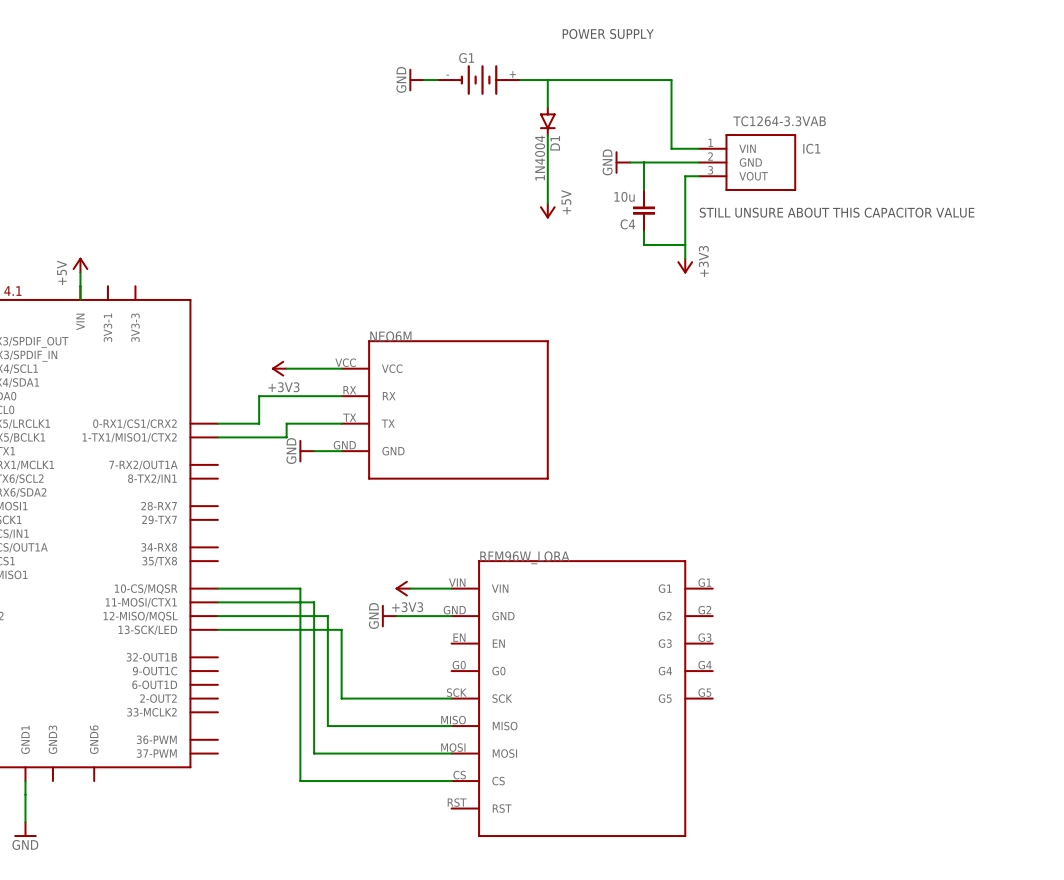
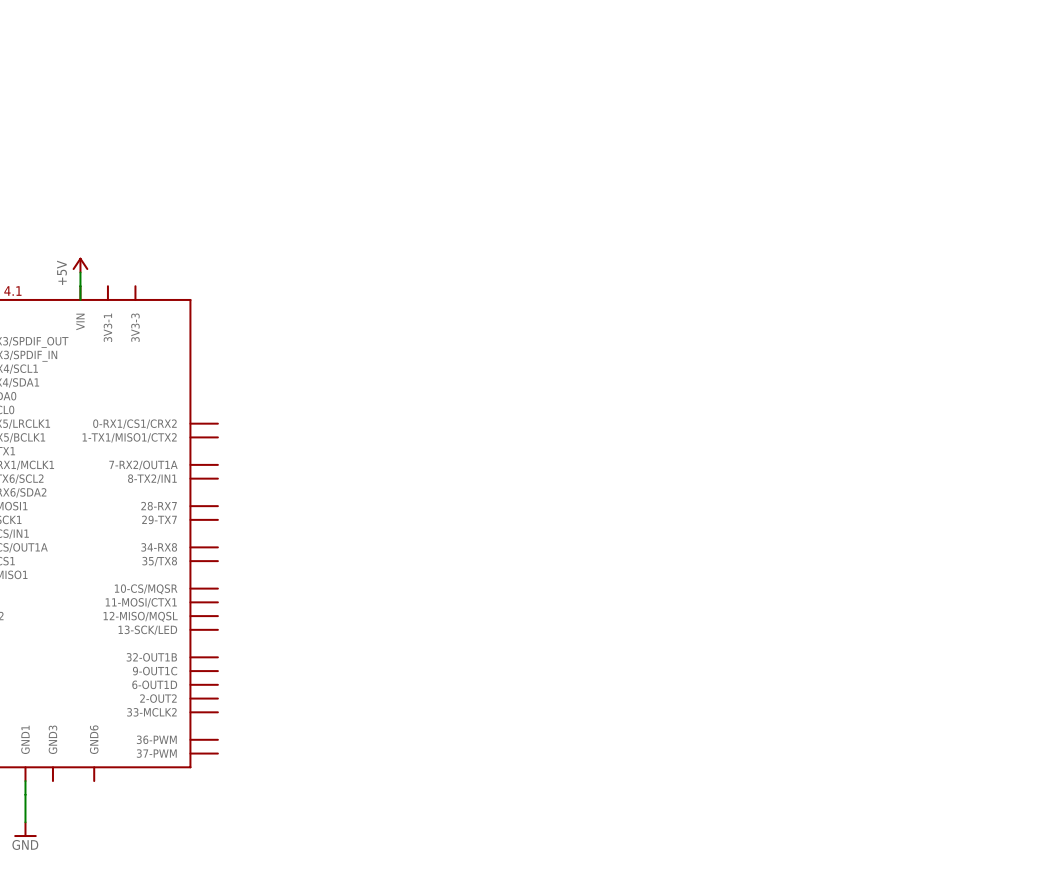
text: POWER SUPPLY (608, 34) -> none
power symbol: GND (416, 80) -> none
wire: (424, 80) (437, 80) -> none
G1: (479, 80) -> none
wire: (520, 80) (671, 80) (671, 148) (699, 148) -> none
wire: (547, 80) (547, 107) -> none
D1: 1N4004 (547, 121) -> none
wire: (547, 135) (547, 203) -> none
power symbol: GND (623, 162) -> none
wire: (630, 162) (699, 162) -> none
wire: (644, 162) (644, 190) -> none
IC1: TC1264-3.3VAB (747, 162) -> none
wire: (699, 176) (685, 176) (685, 258) -> none
power symbol: +5V (547, 210) -> none
C4: 10u (644, 210) -> none
text: STILL UNSURE ABOUT THIS CAPACITOR VALUE (837, 212) -> none
wire: (644, 231) (644, 244) (685, 244) -> none
power symbol: +3V3 (685, 265) -> none
power symbol: +3V3 (279, 368) -> none
wire: (286, 368) (341, 368) -> none
wire: (341, 396) (259, 396) (259, 423) (217, 423) -> none
part: (445, 409) -> none
wire: (341, 423) (286, 423) (286, 437) (217, 437) -> none
power symbol: GND (306, 451) -> none
wire: (314, 451) (341, 451) -> none
wire: (217, 588) (300, 588) (300, 781) (451, 781) -> none
power symbol: +3V3 (403, 588) -> none
wire: (410, 588) (451, 588) -> none
wire: (217, 602) (314, 602) (314, 753) (451, 753) -> none
wire: (217, 616) (327, 616) (327, 726) (451, 726) -> none
power symbol: GND (389, 616) -> none
wire: (396, 616) (451, 616) -> none
wire: (217, 629) (341, 629) (341, 698) (451, 698) -> none
part: (582, 698) -> none

